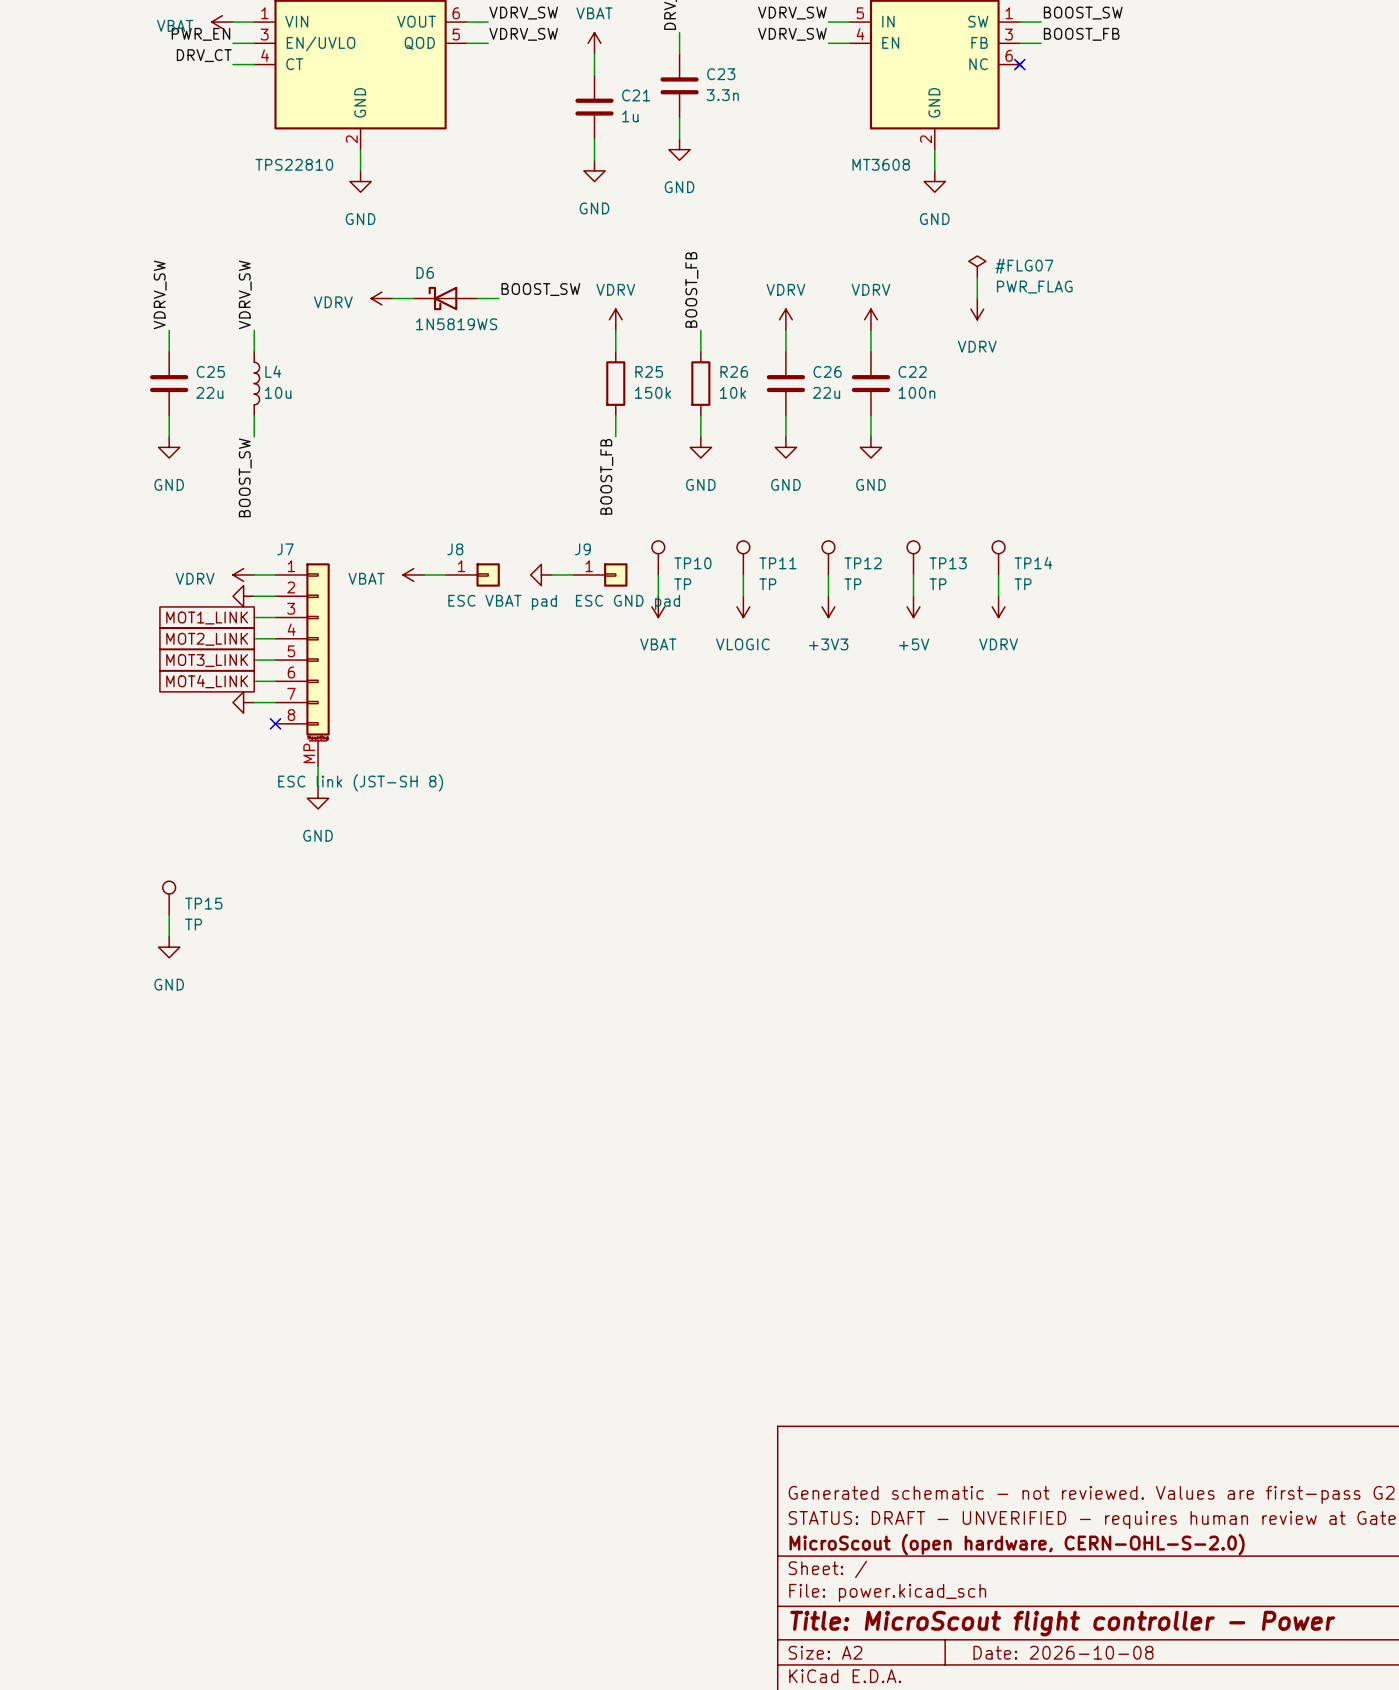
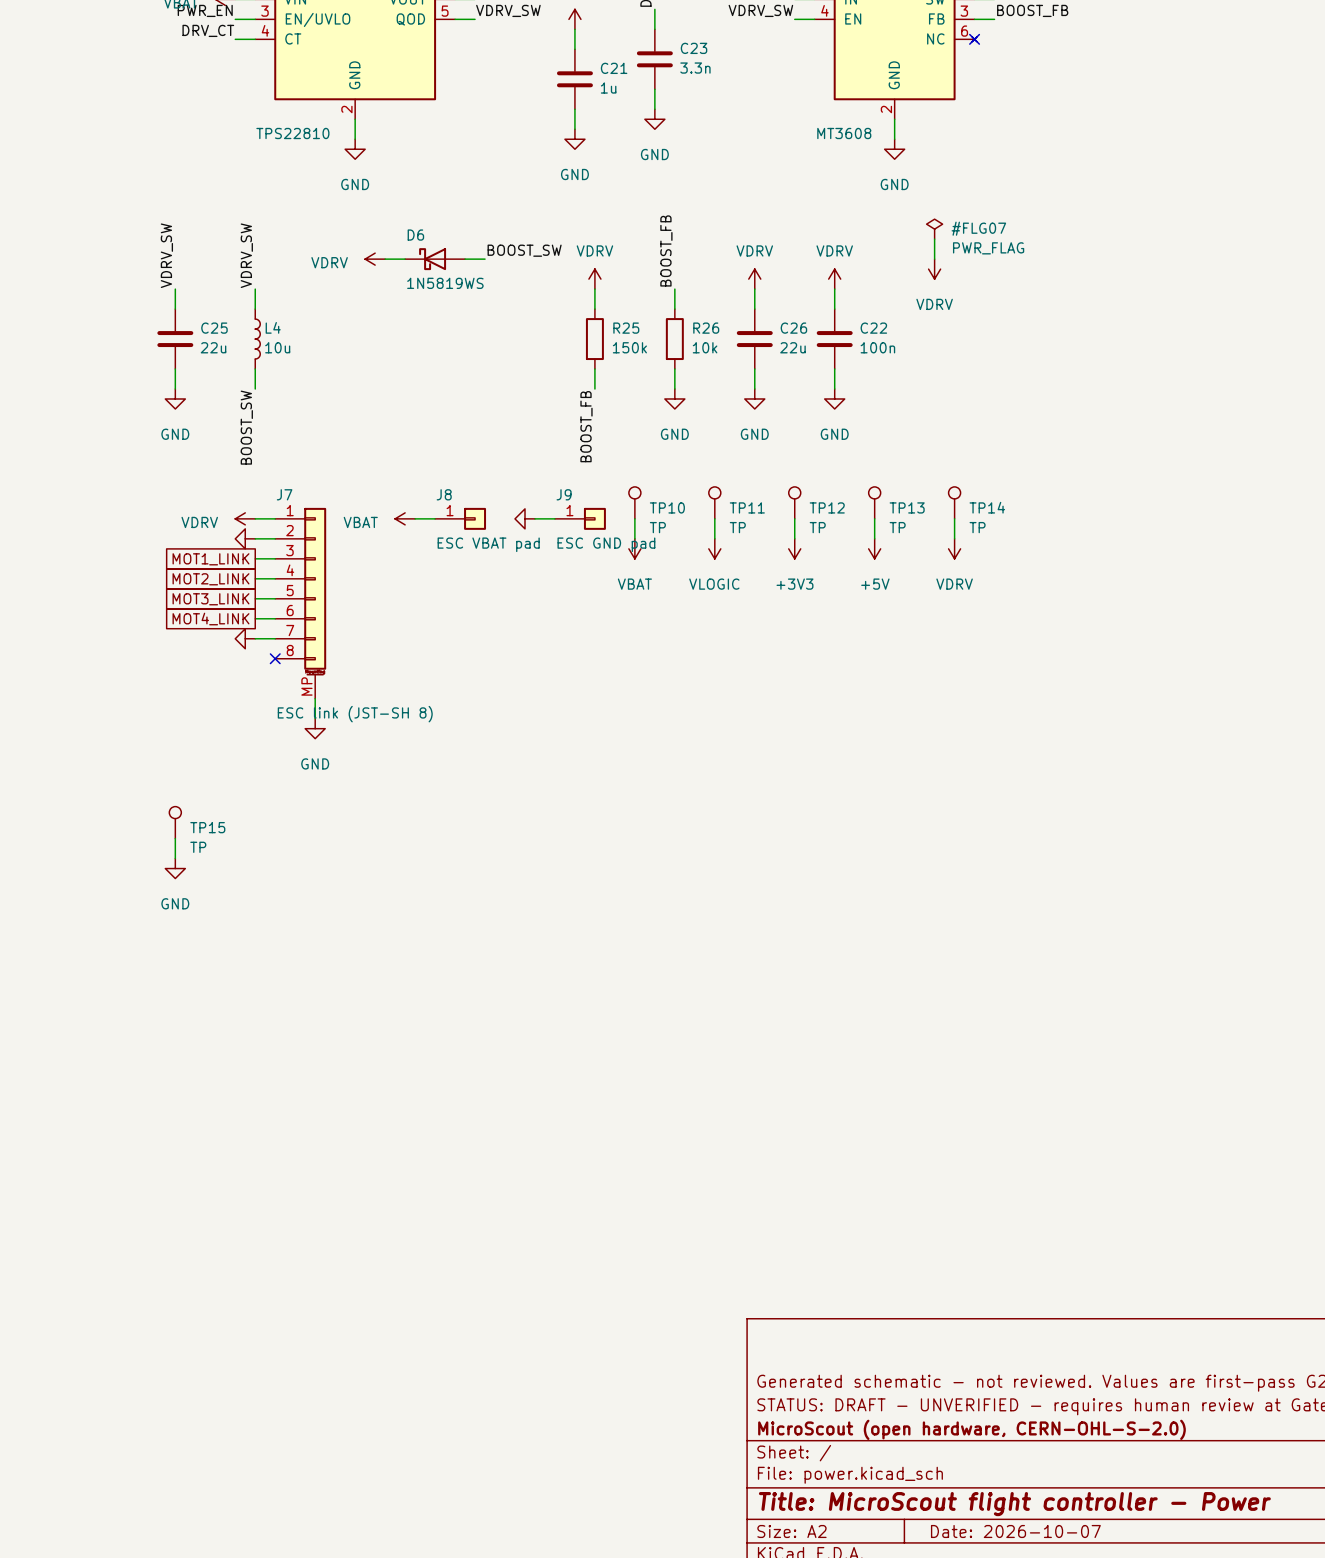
title block: Date: 2026-10-08 (1063, 1652) -> Date: 2026-10-07 (1015, 1531)

